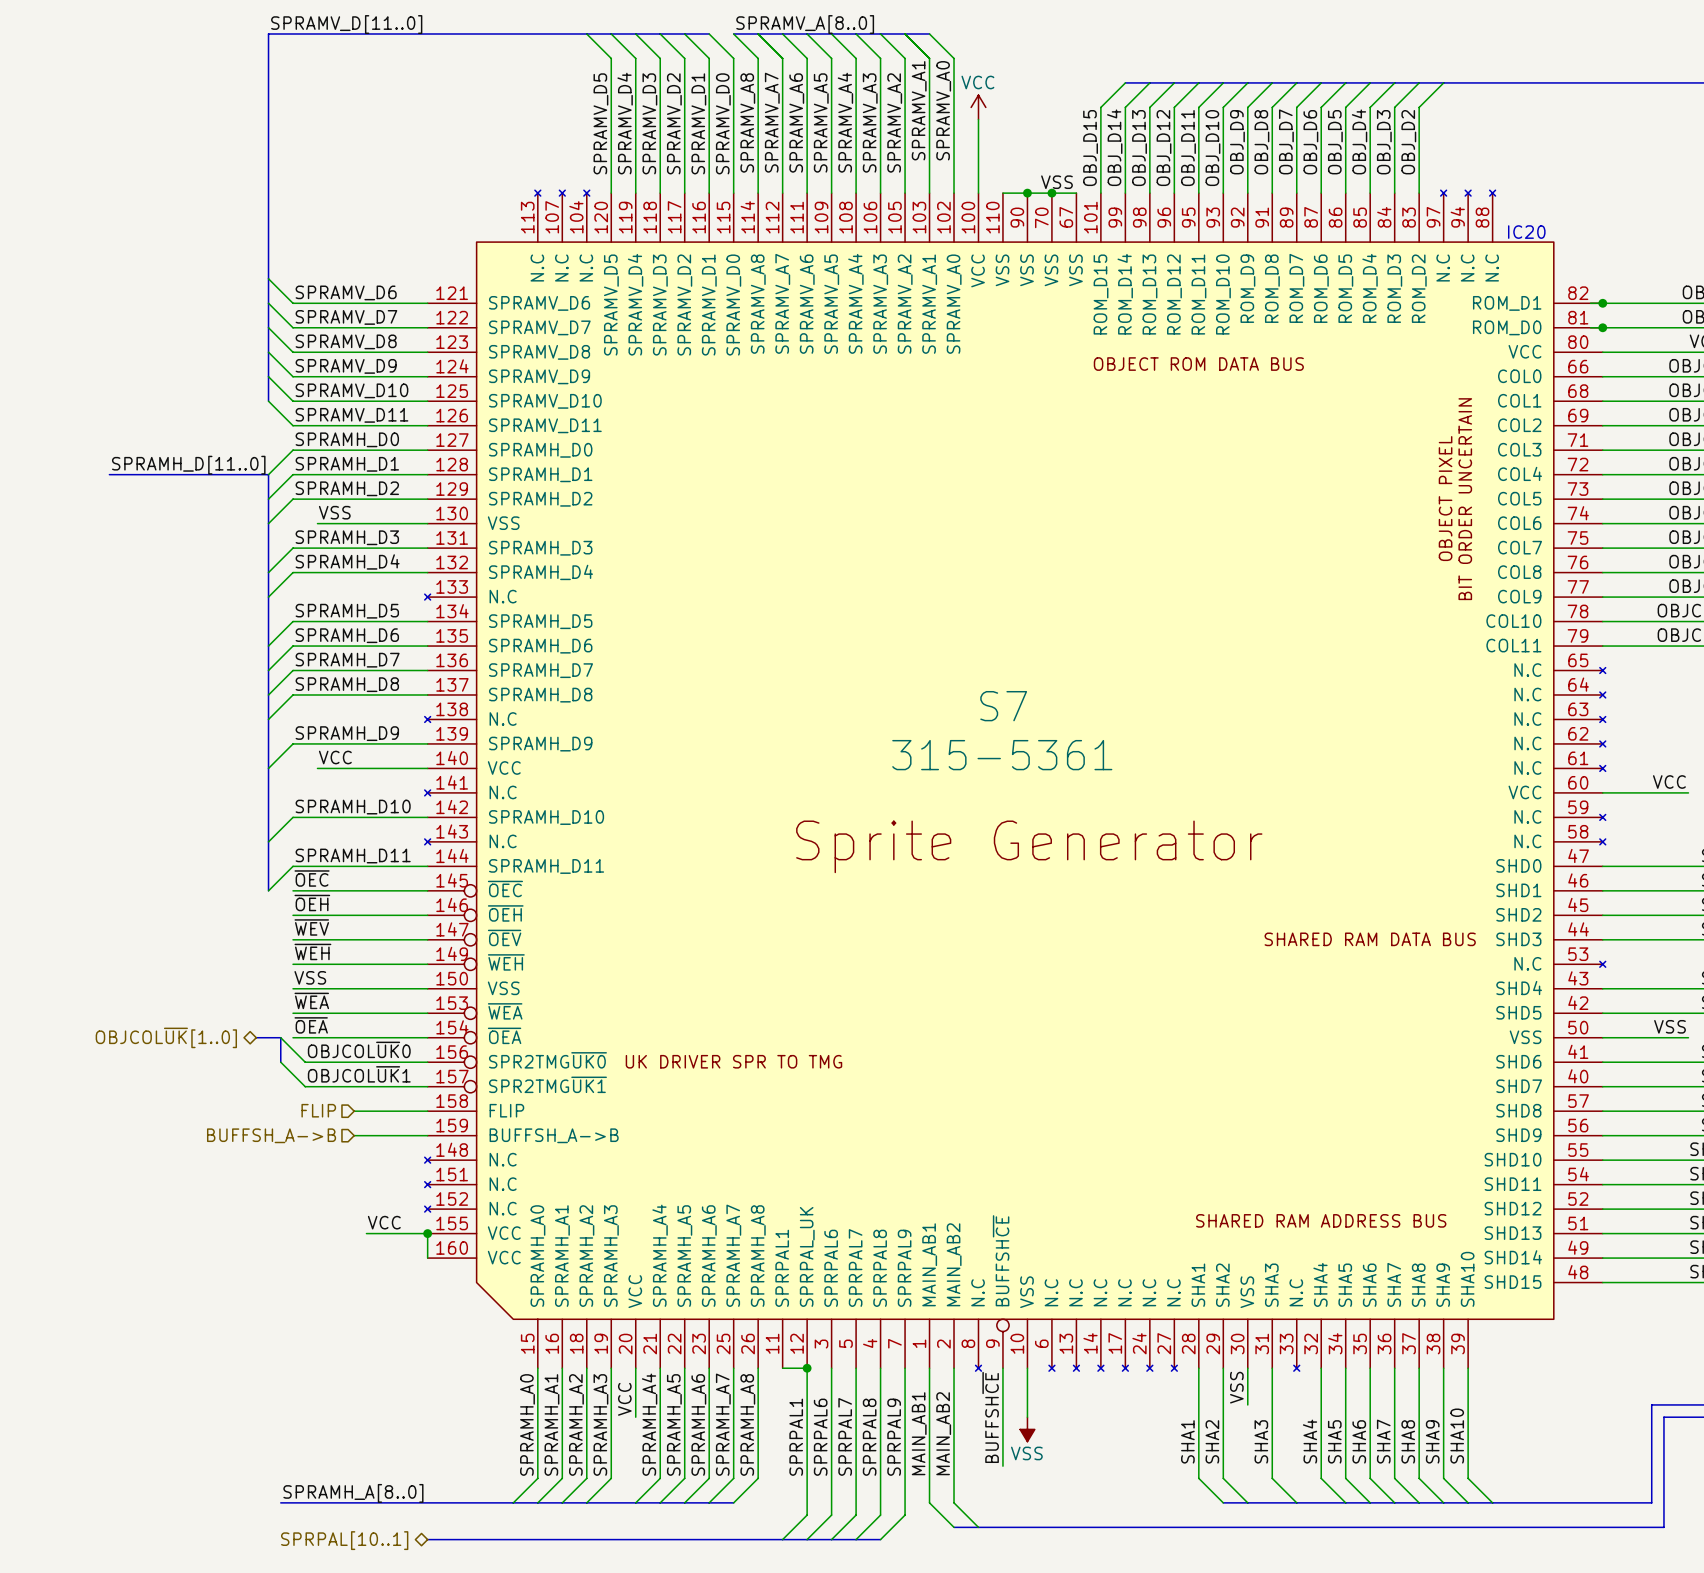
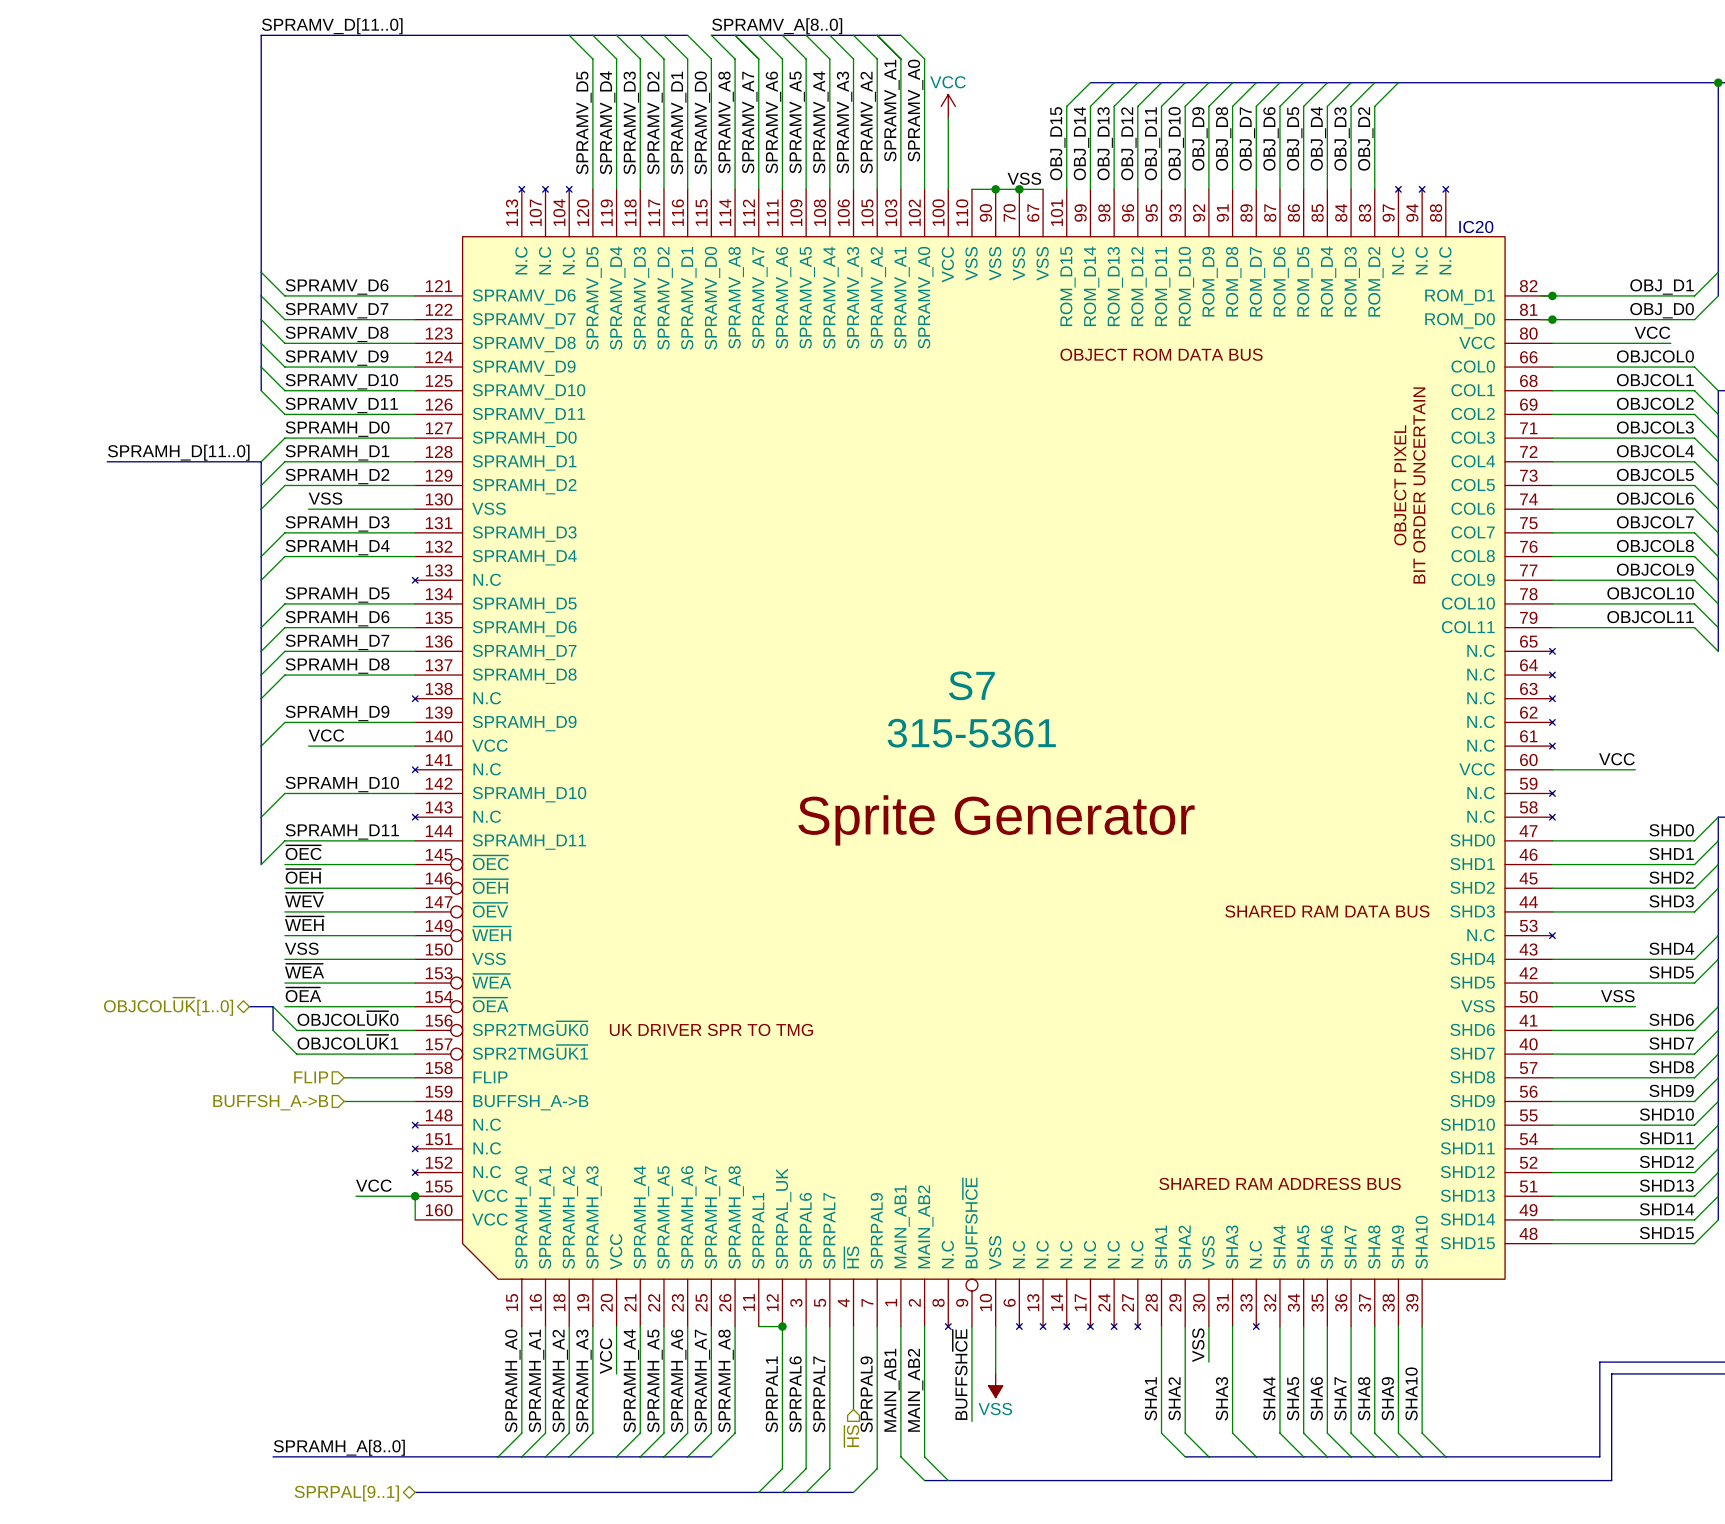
S7 pin name: SPRPAL8 (880, 1268) -> ~{HS} (851, 1257)
label: SPRPAL8 (869, 1437) -> none
wire: (880, 1453) (880, 1515) (856, 1539) -> none
hierarchical label: none -> ~{HS} (851, 1436)
hierarchical label: SPRPAL[10..1] (344, 1540) -> SPRPAL[9..1] (346, 1493)

